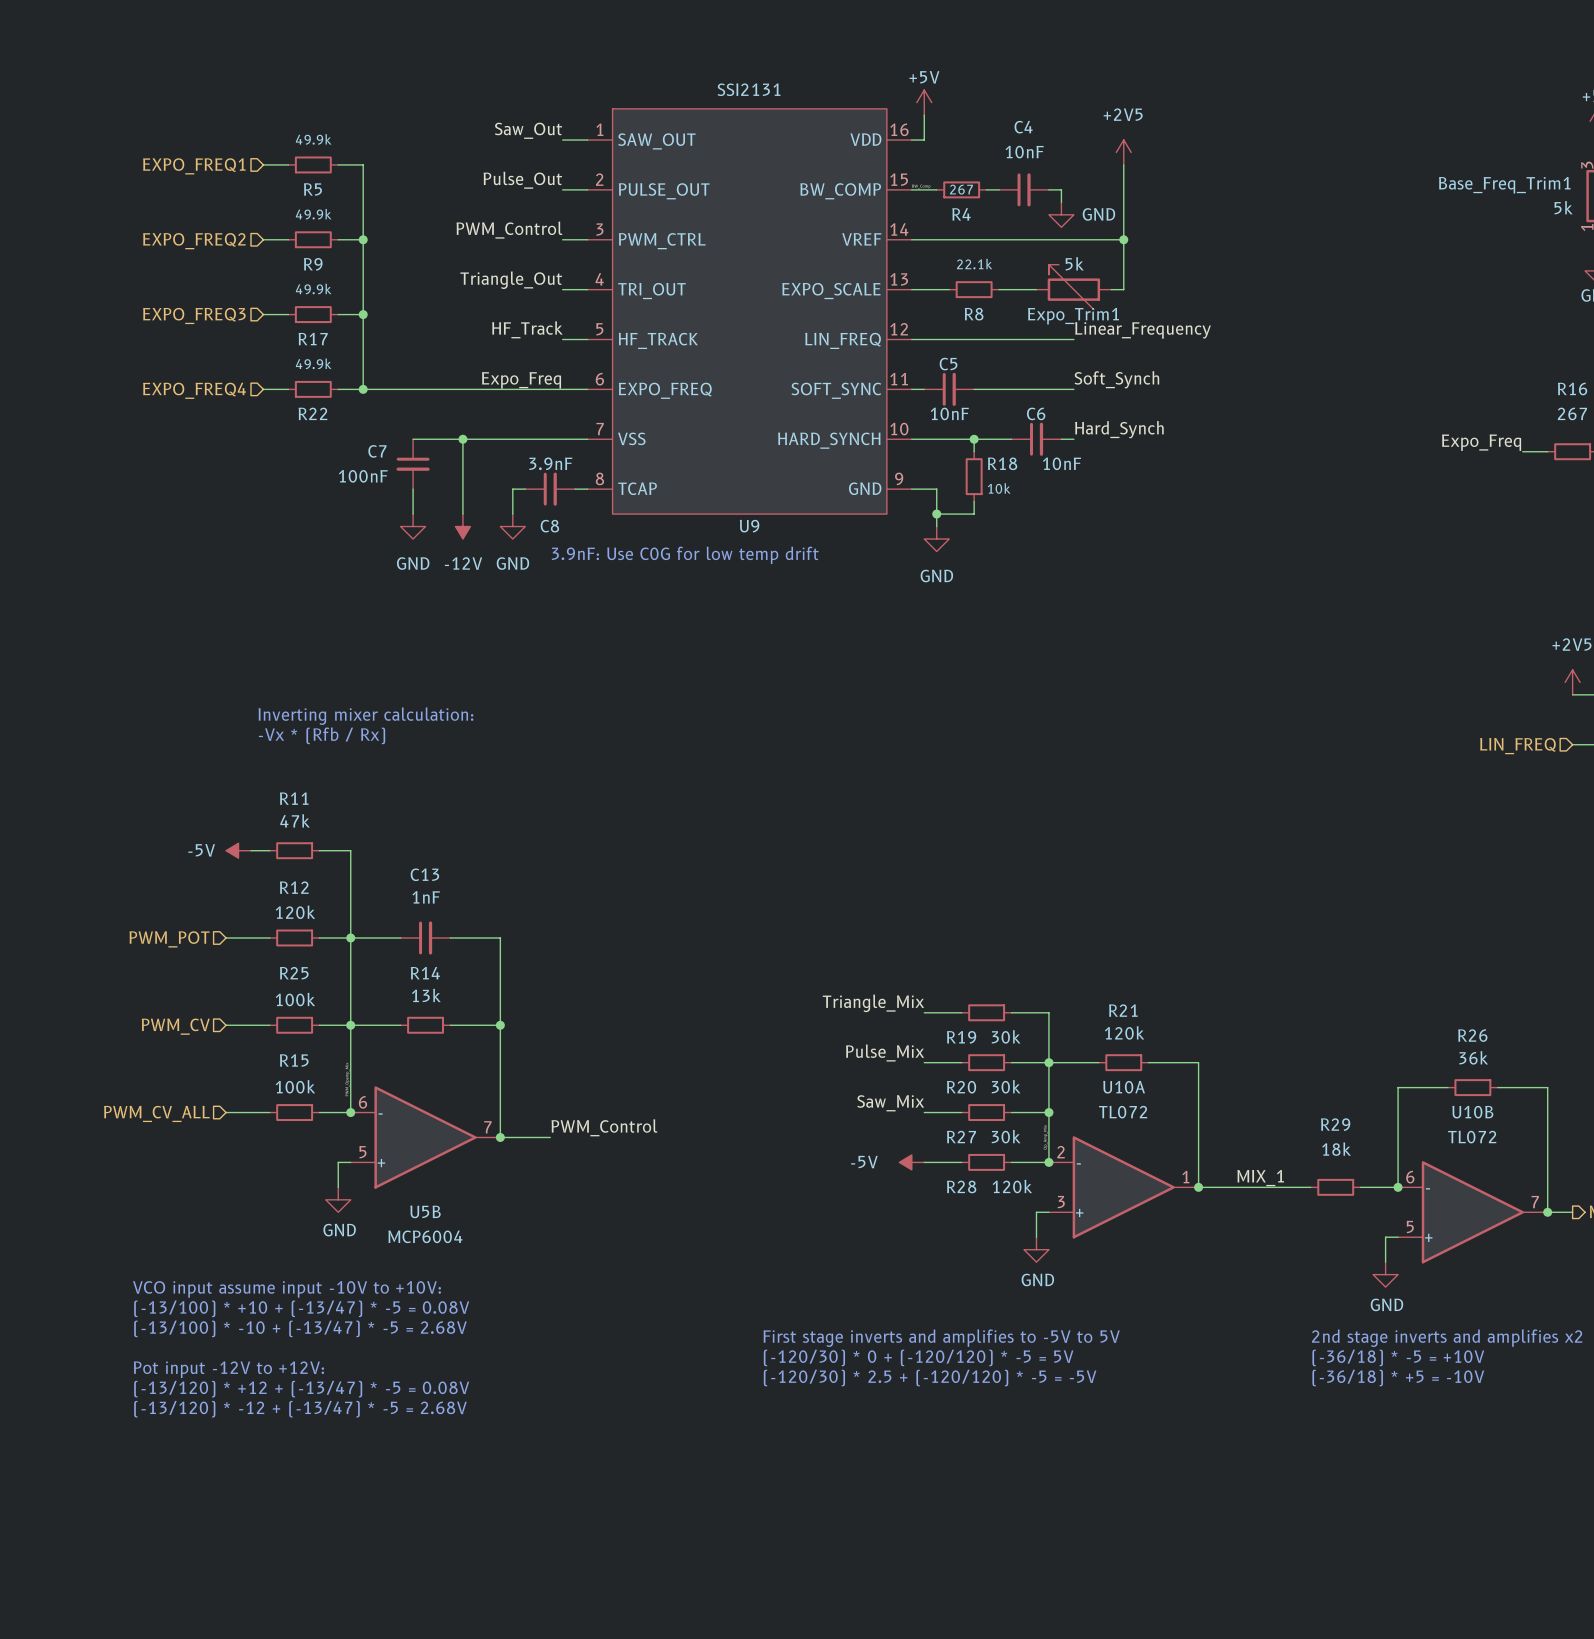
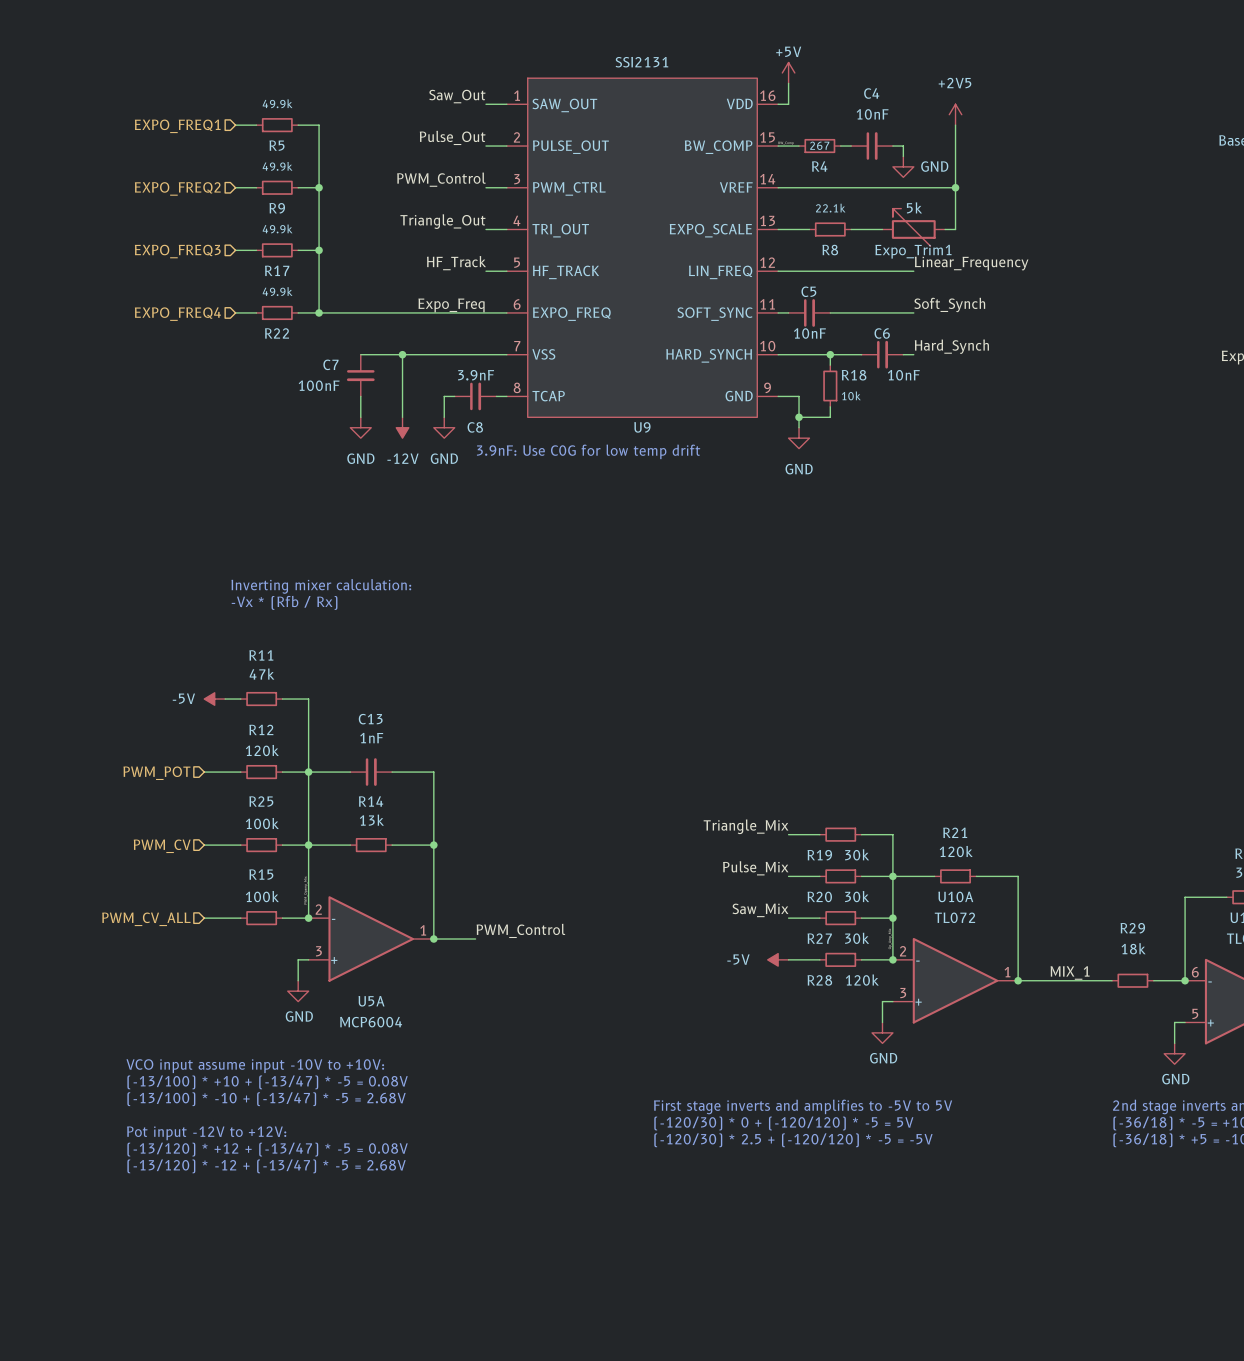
U5B pin number: 6 (363, 1102) -> 2 (318, 909)
U5B pin number: 7 (487, 1127) -> 1 (423, 930)
U5B pin number: 5 (362, 1152) -> 3 (318, 951)
U5B name: U5B (425, 1211) -> U5A (371, 1001)

